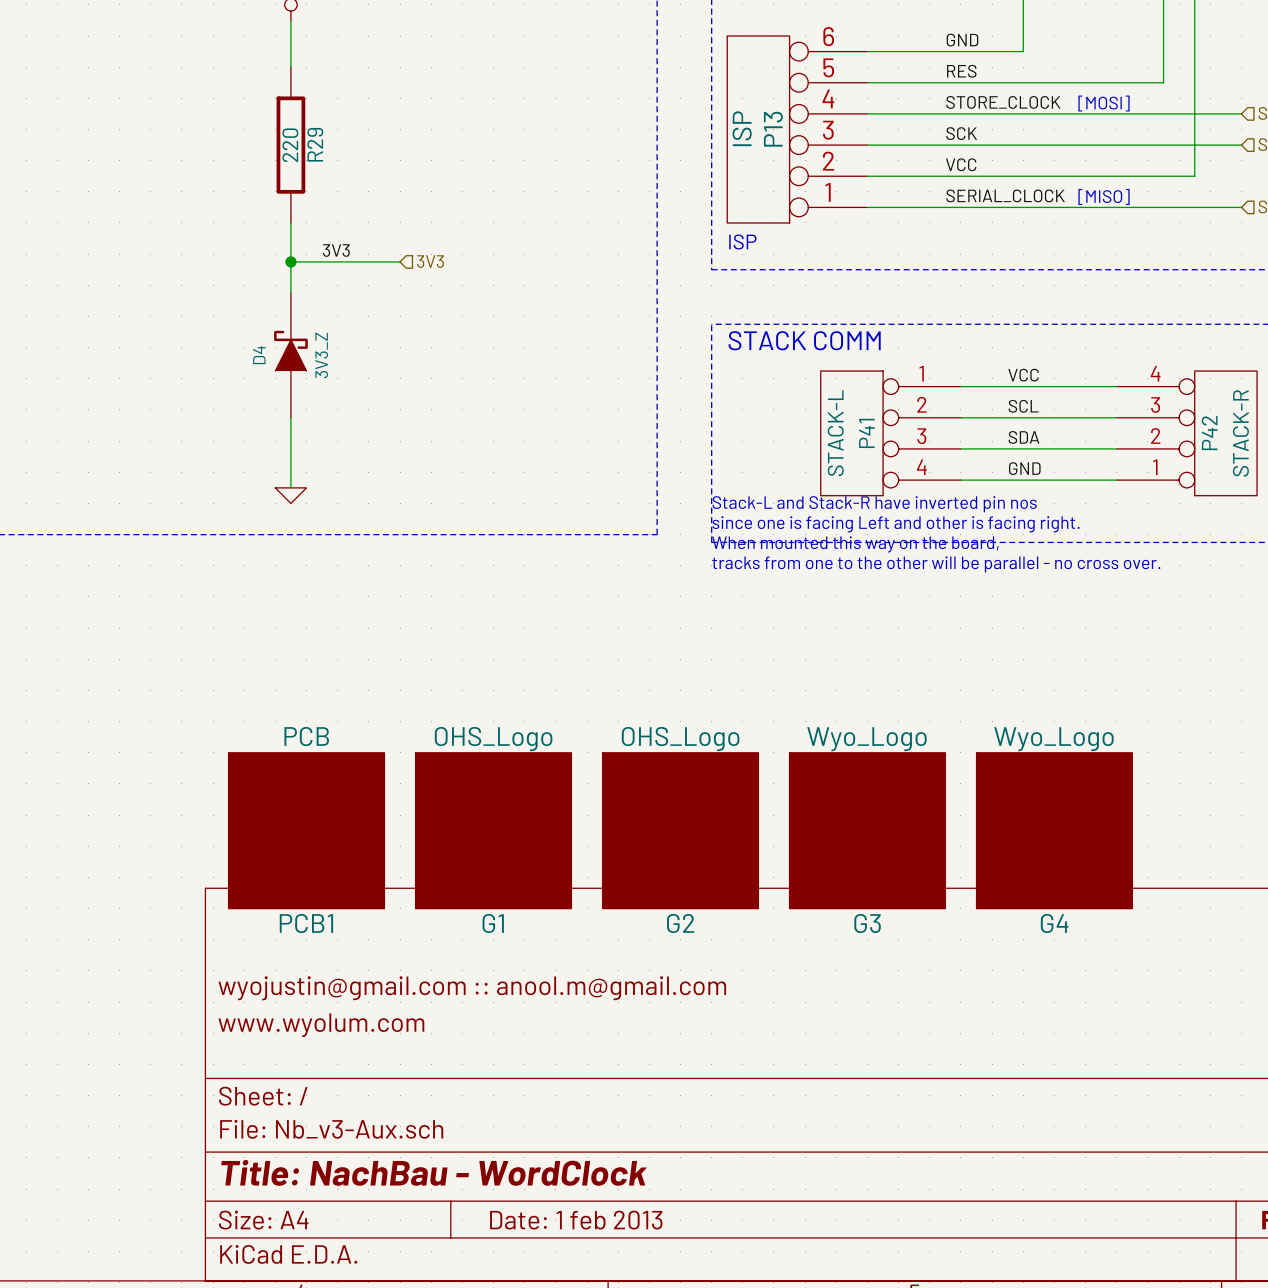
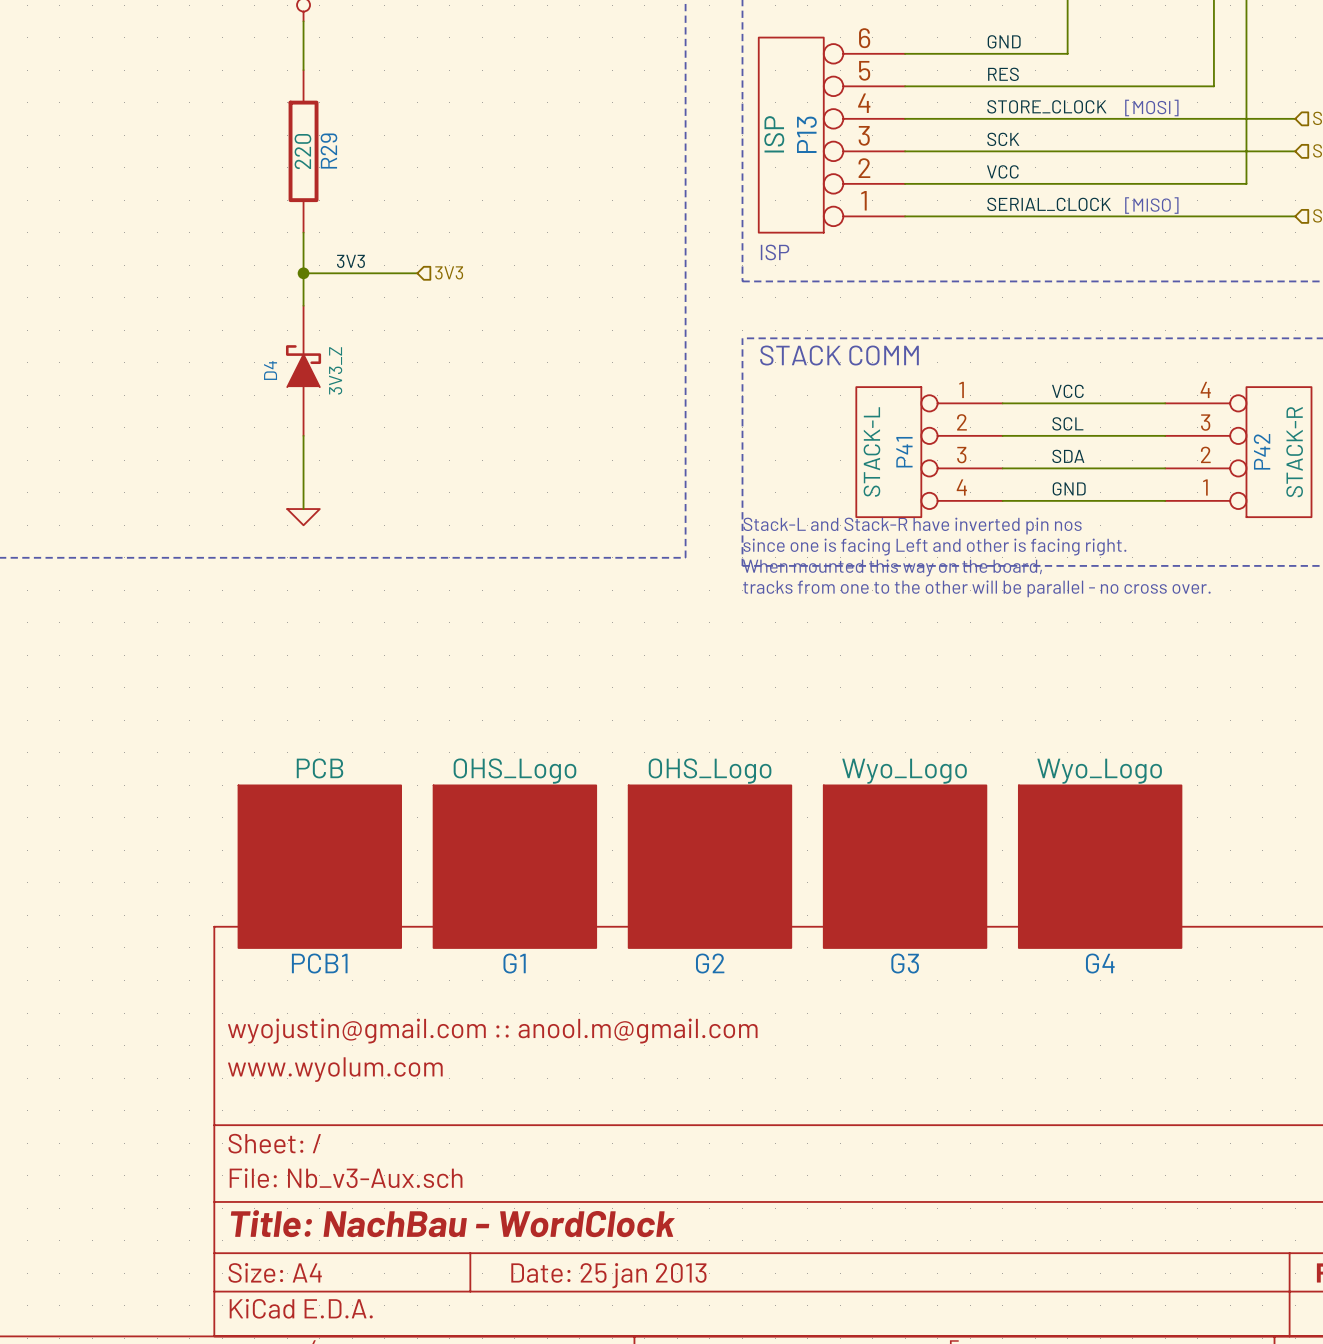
title block: Date: 1 feb 2013 (576, 1220) -> Date: 25 jan 2013 (608, 1275)

